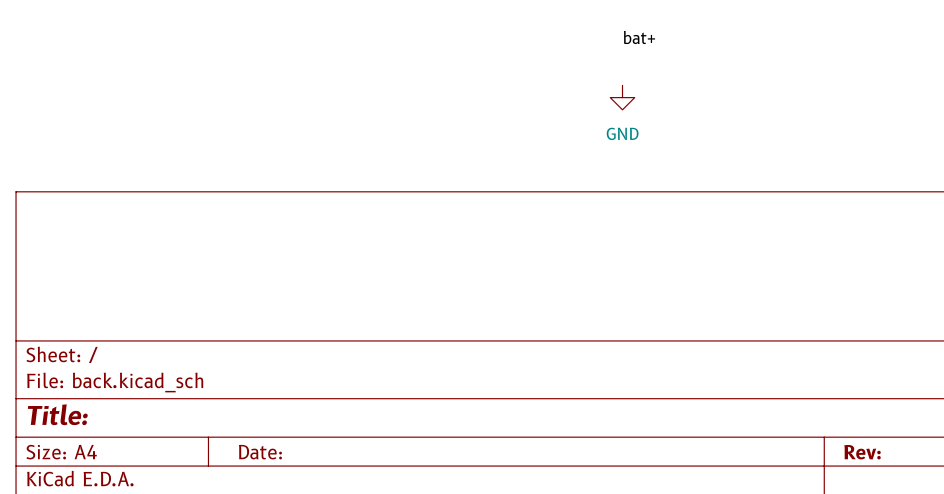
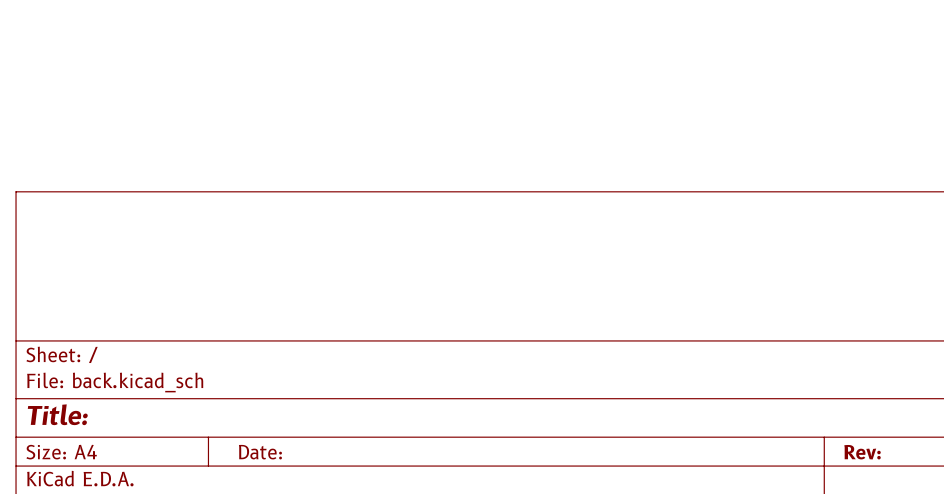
label: bat+ (639, 37) -> none
power symbol: GND (622, 97) -> none

